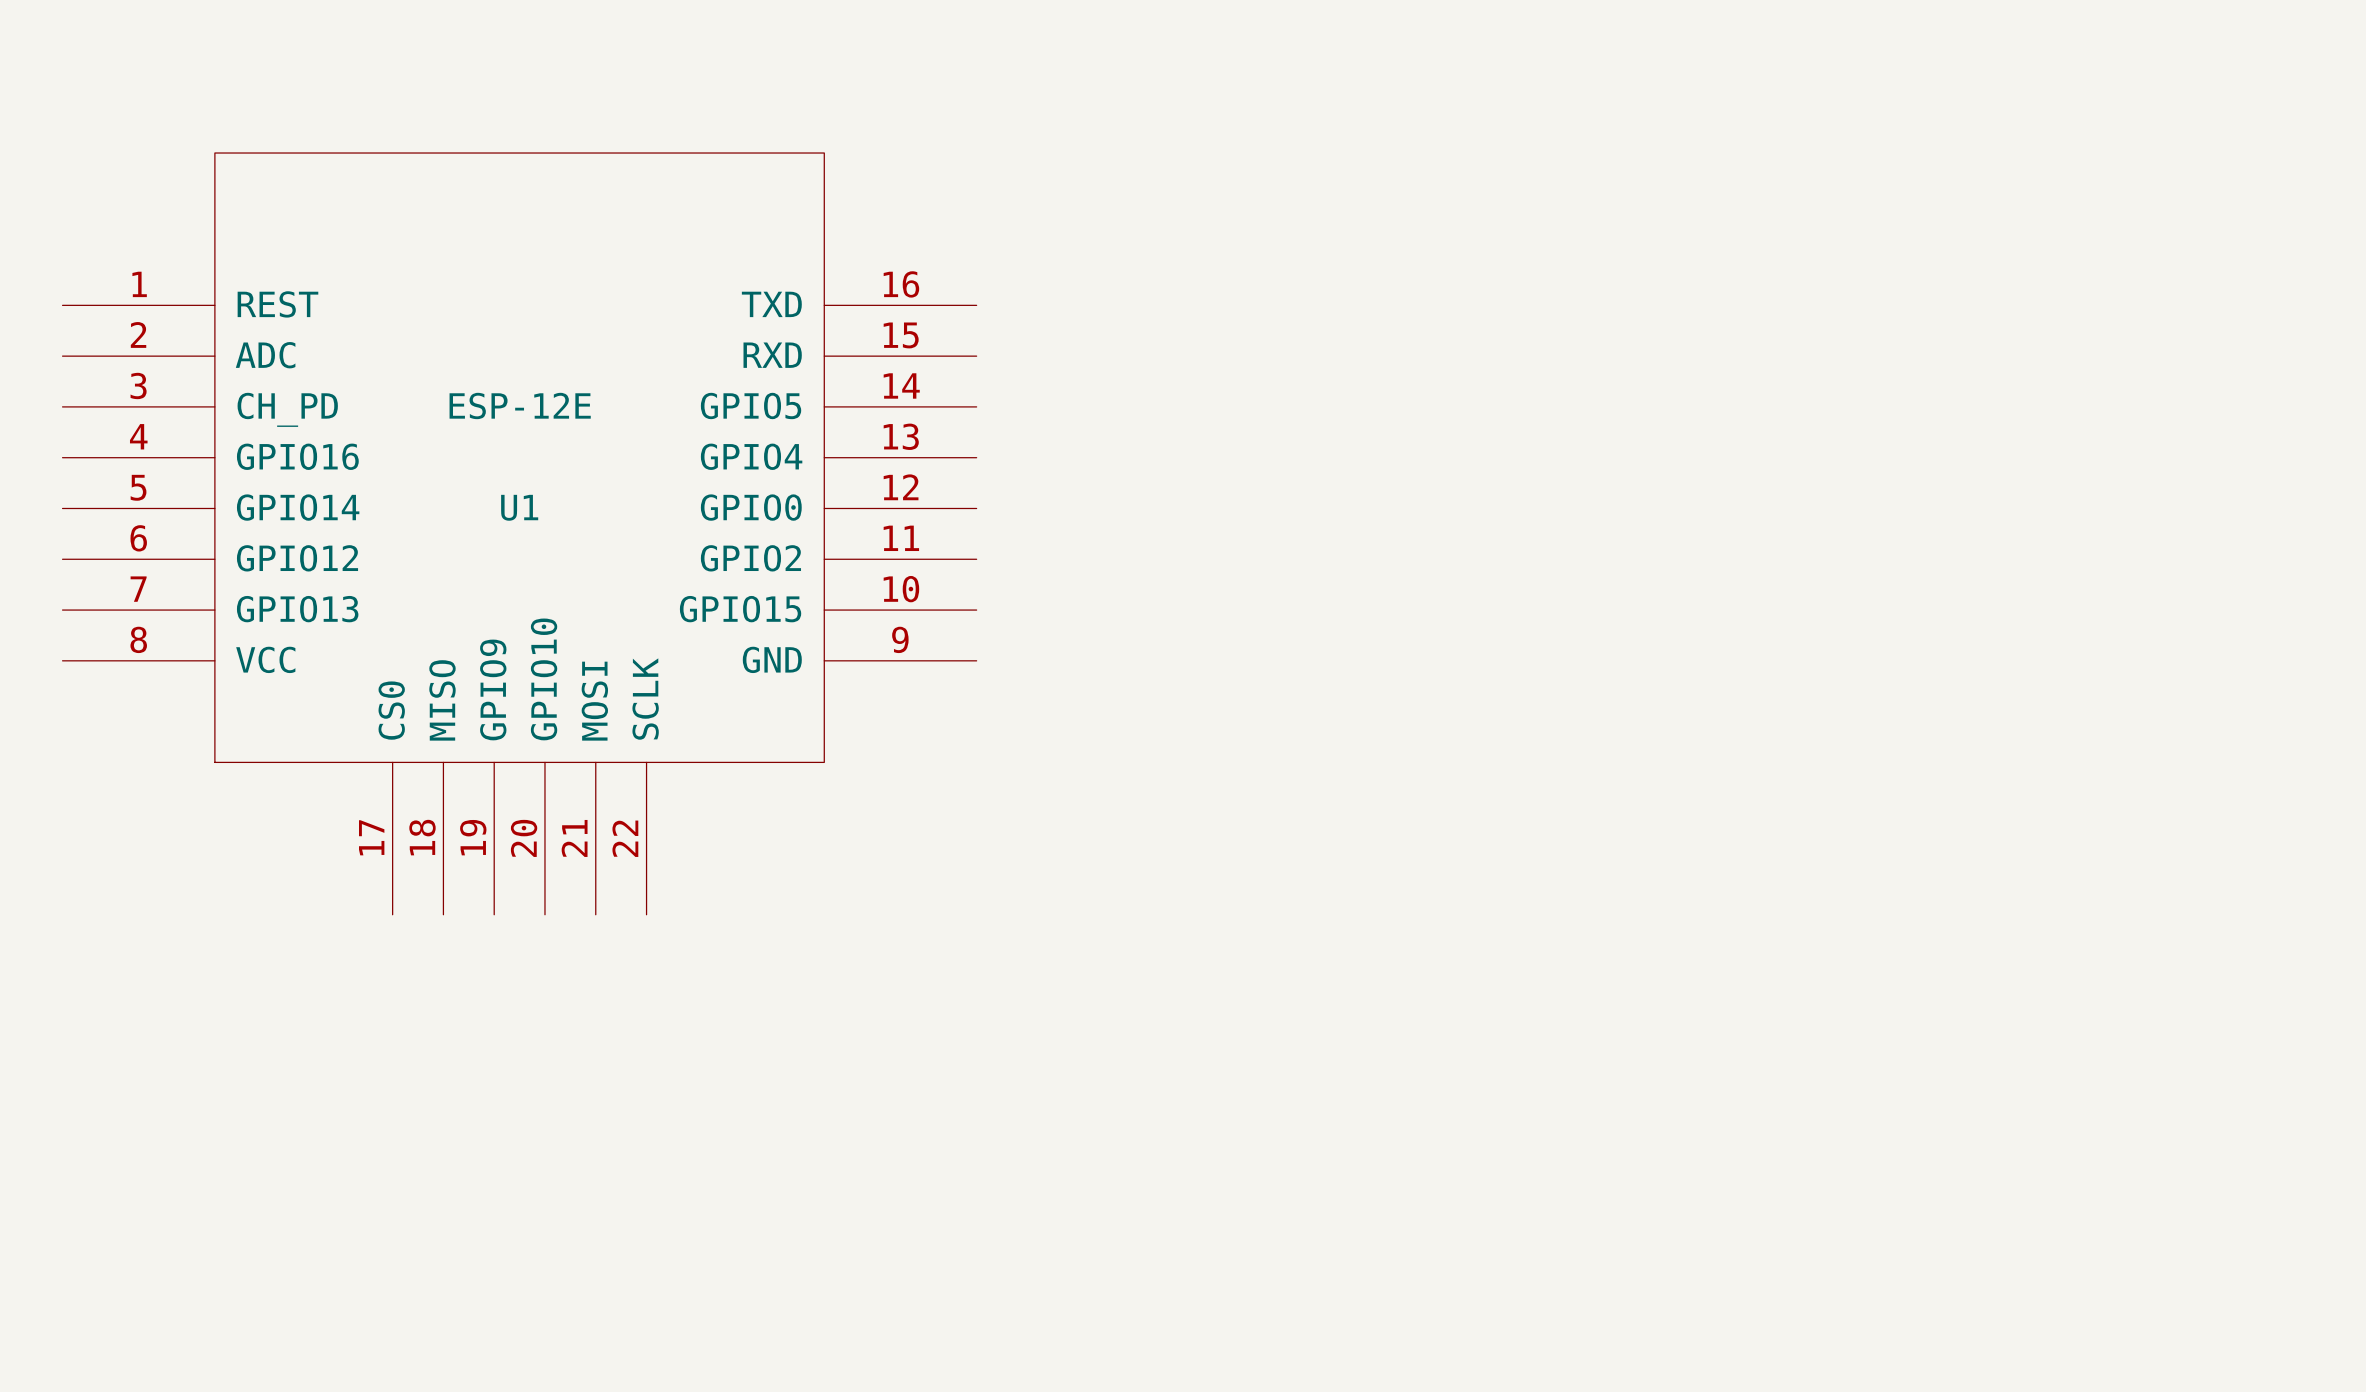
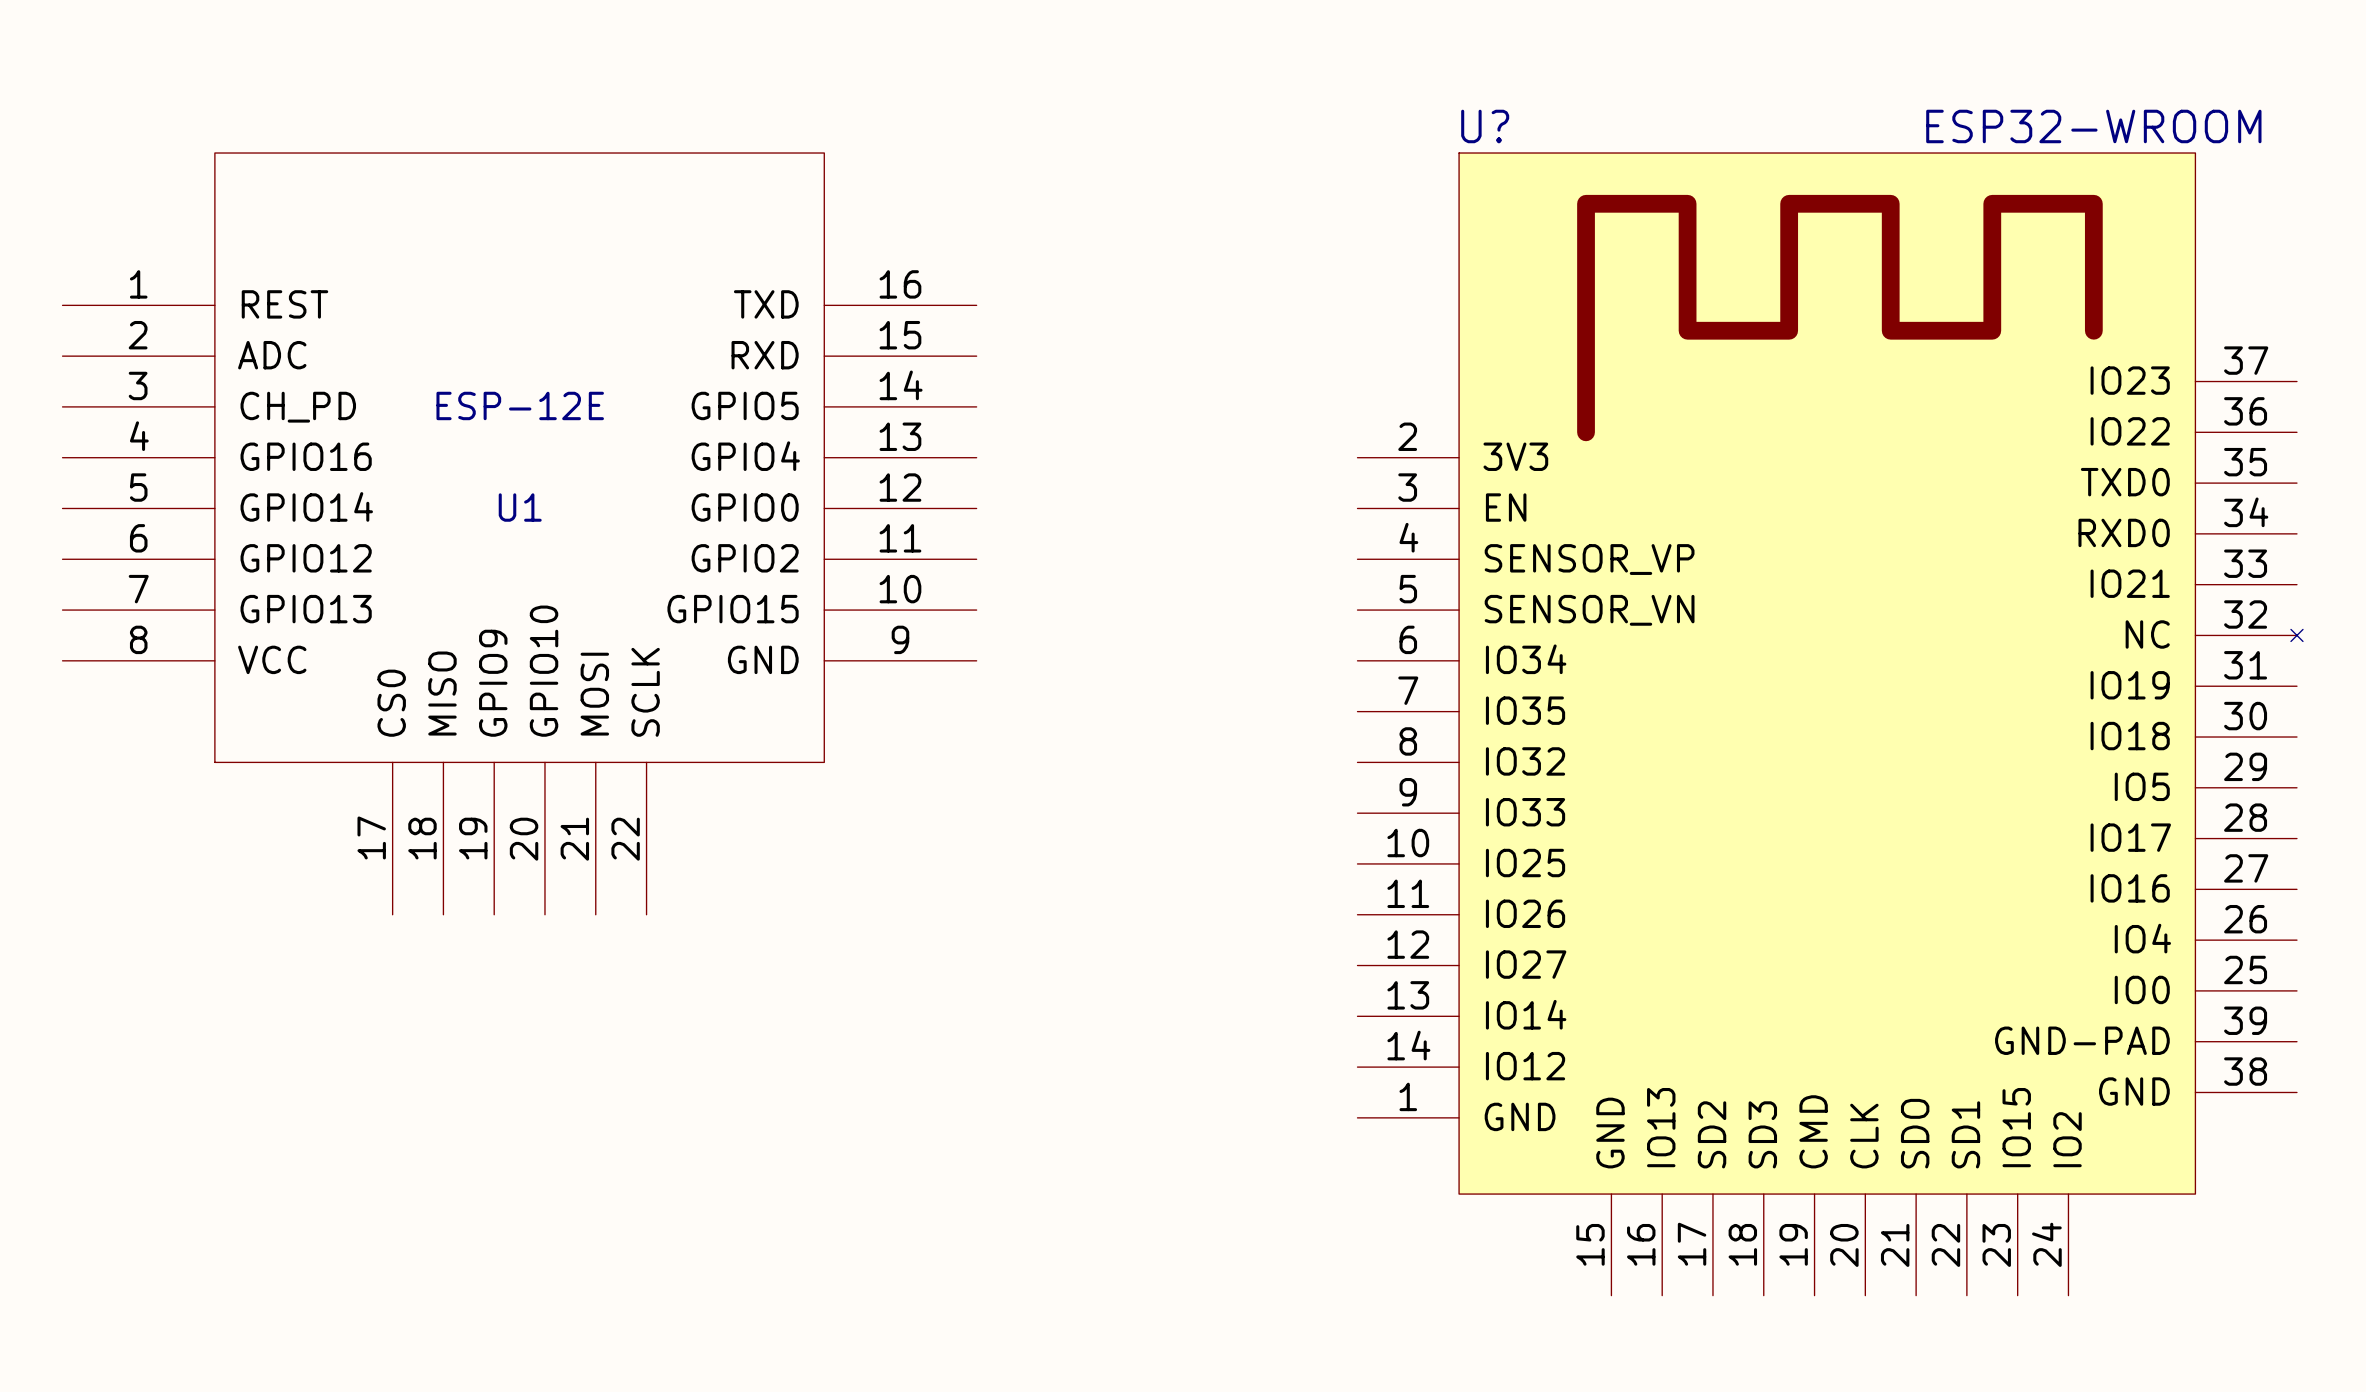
U?: none -> ESP32-WROOM (1830, 724)

